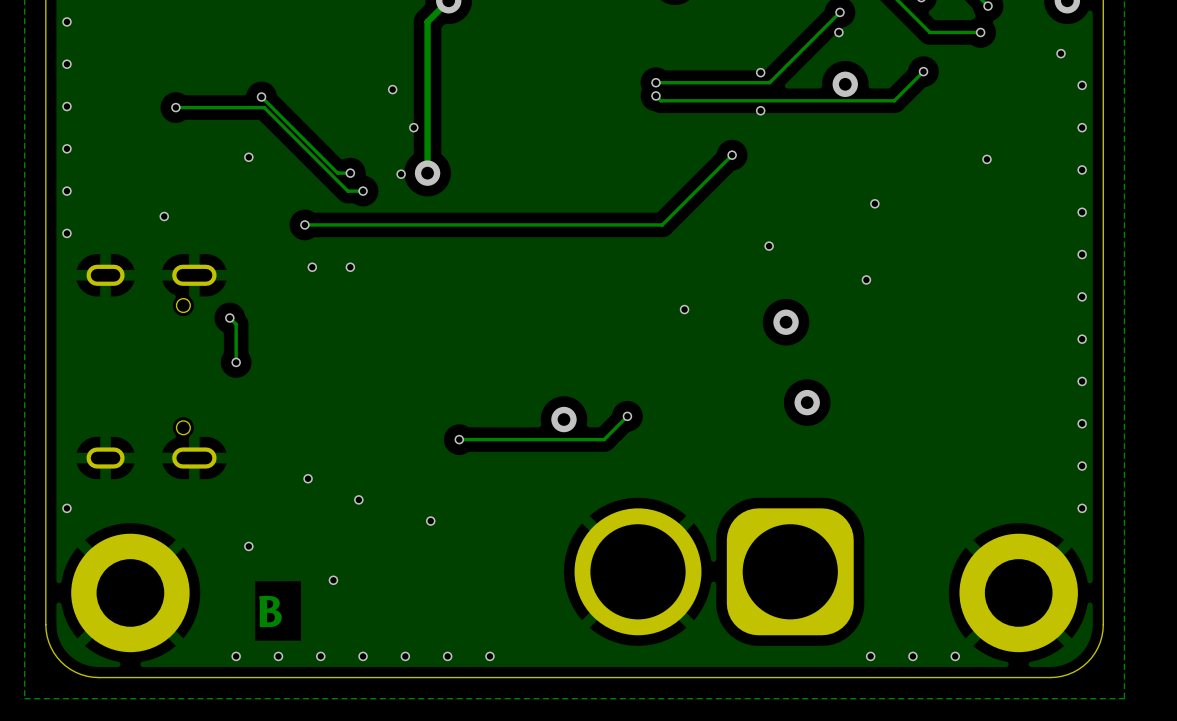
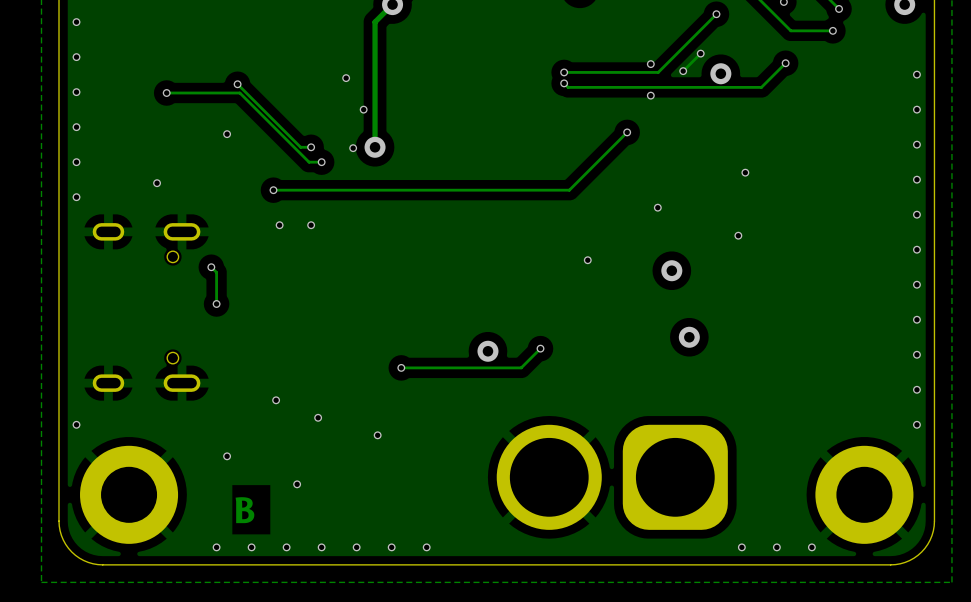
via: (838, 32) -> none
via: (1060, 53) -> none
track: none -> (700, 53) (683, 71)
via: none -> (700, 53)
via: none -> (683, 71)
via: (986, 159) -> none

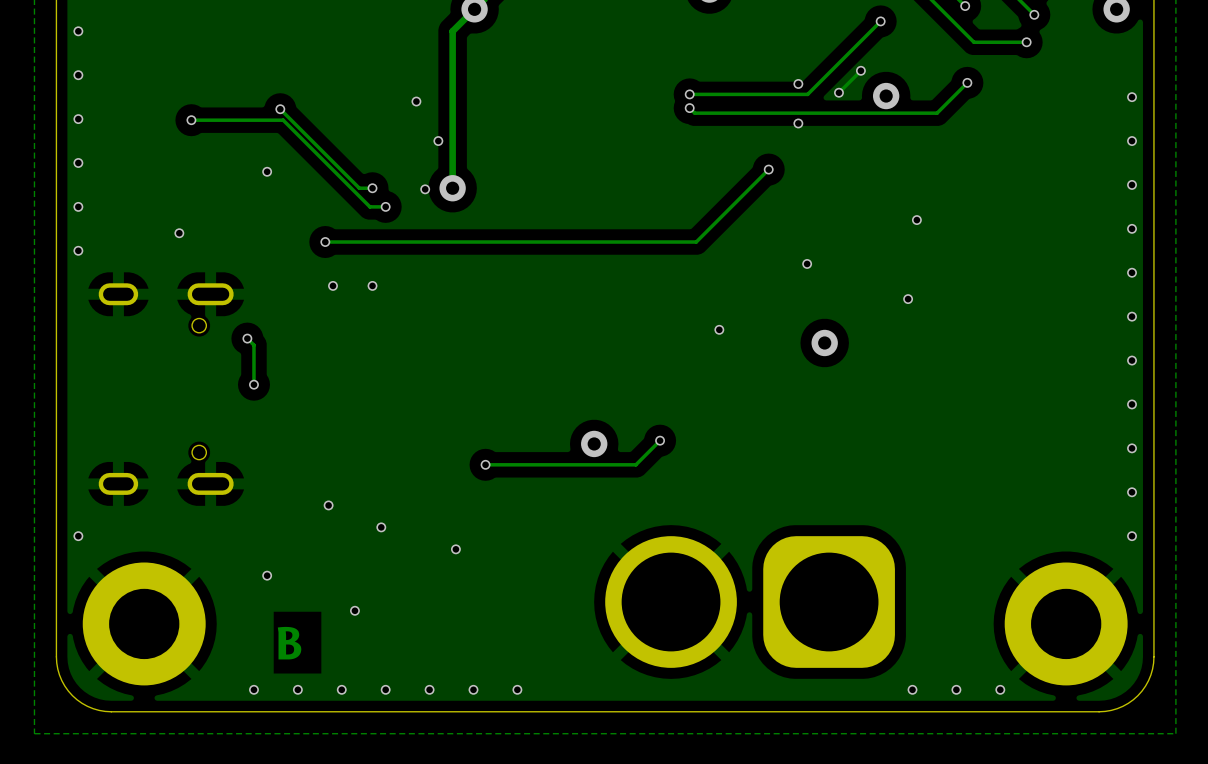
via: (689, 337) -> none

